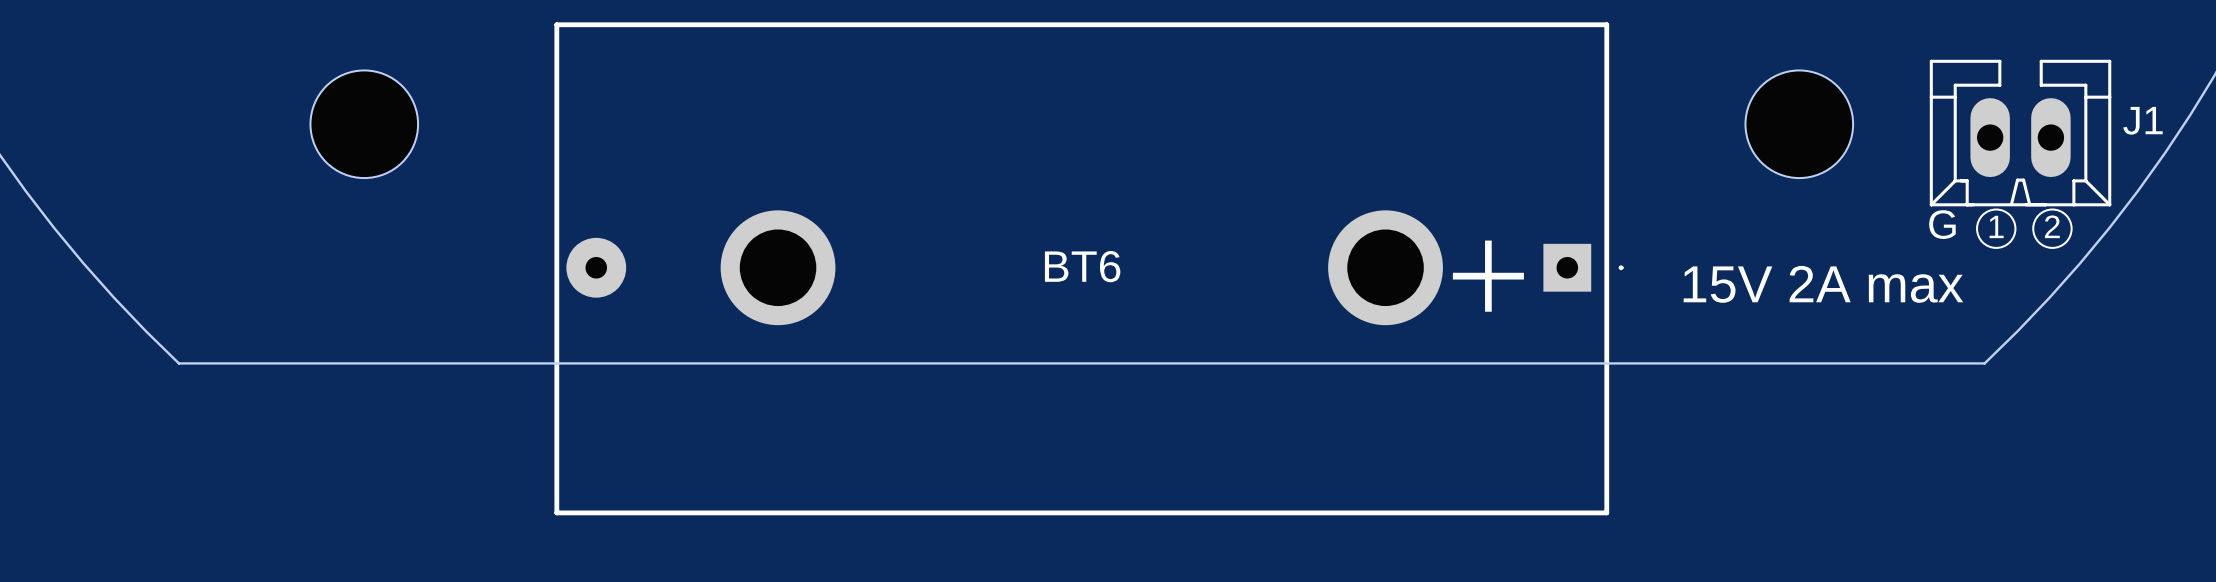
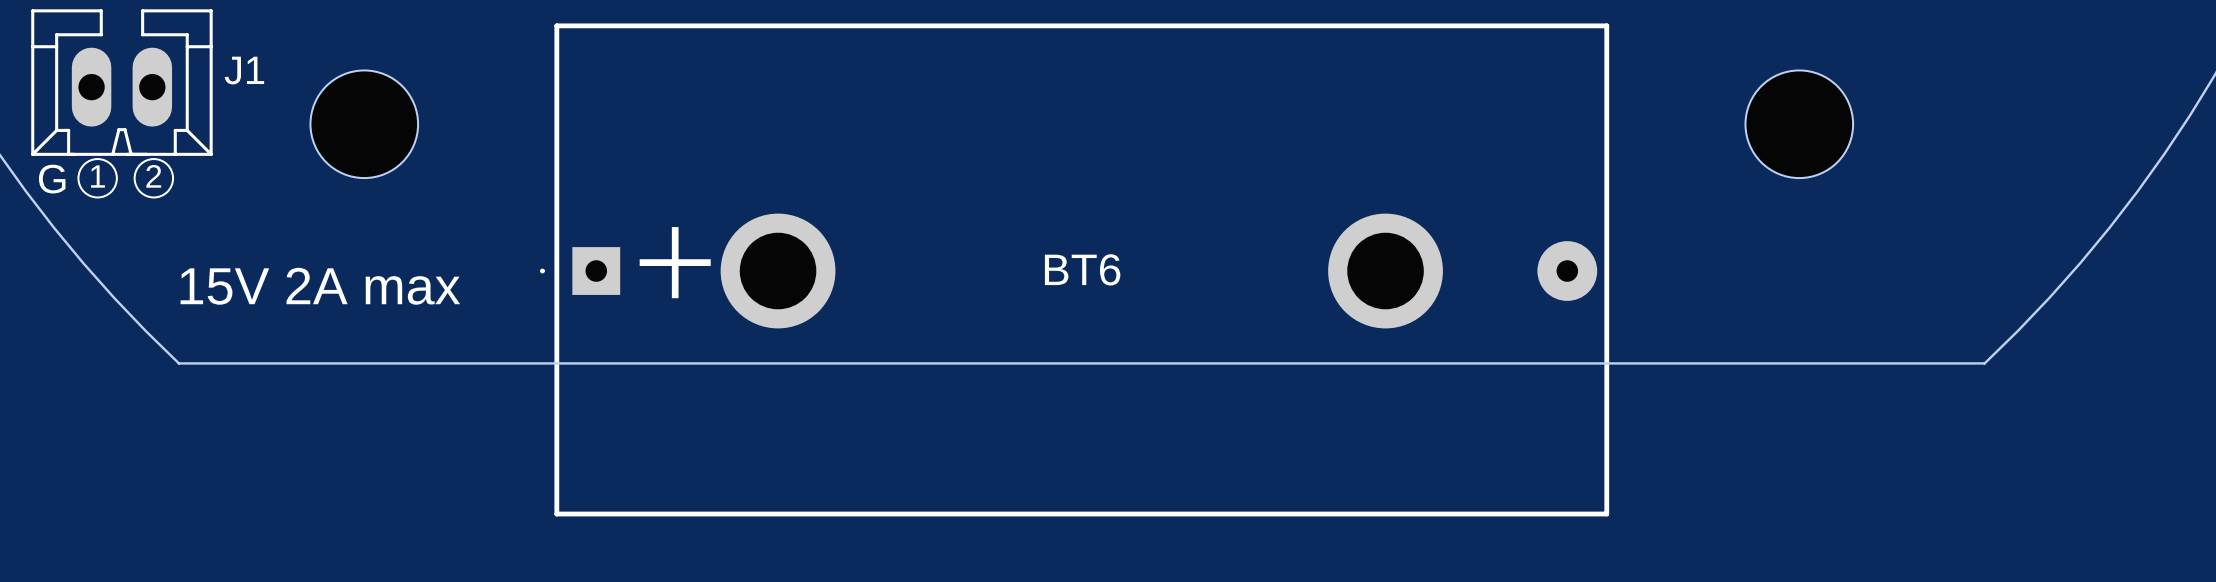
J1 position: (2020, 154) -> (121, 103)
J1 text position: G (1942, 224) -> G (52, 179)
text: none -> ＋ (675, 262)
BT6 rotation: 0° (1088, 268) -> 180° (1074, 269)
text: ＋ (1488, 276) -> none
text: 15V 2A max (1823, 284) -> none
text: none -> 15V 2A max (320, 286)

